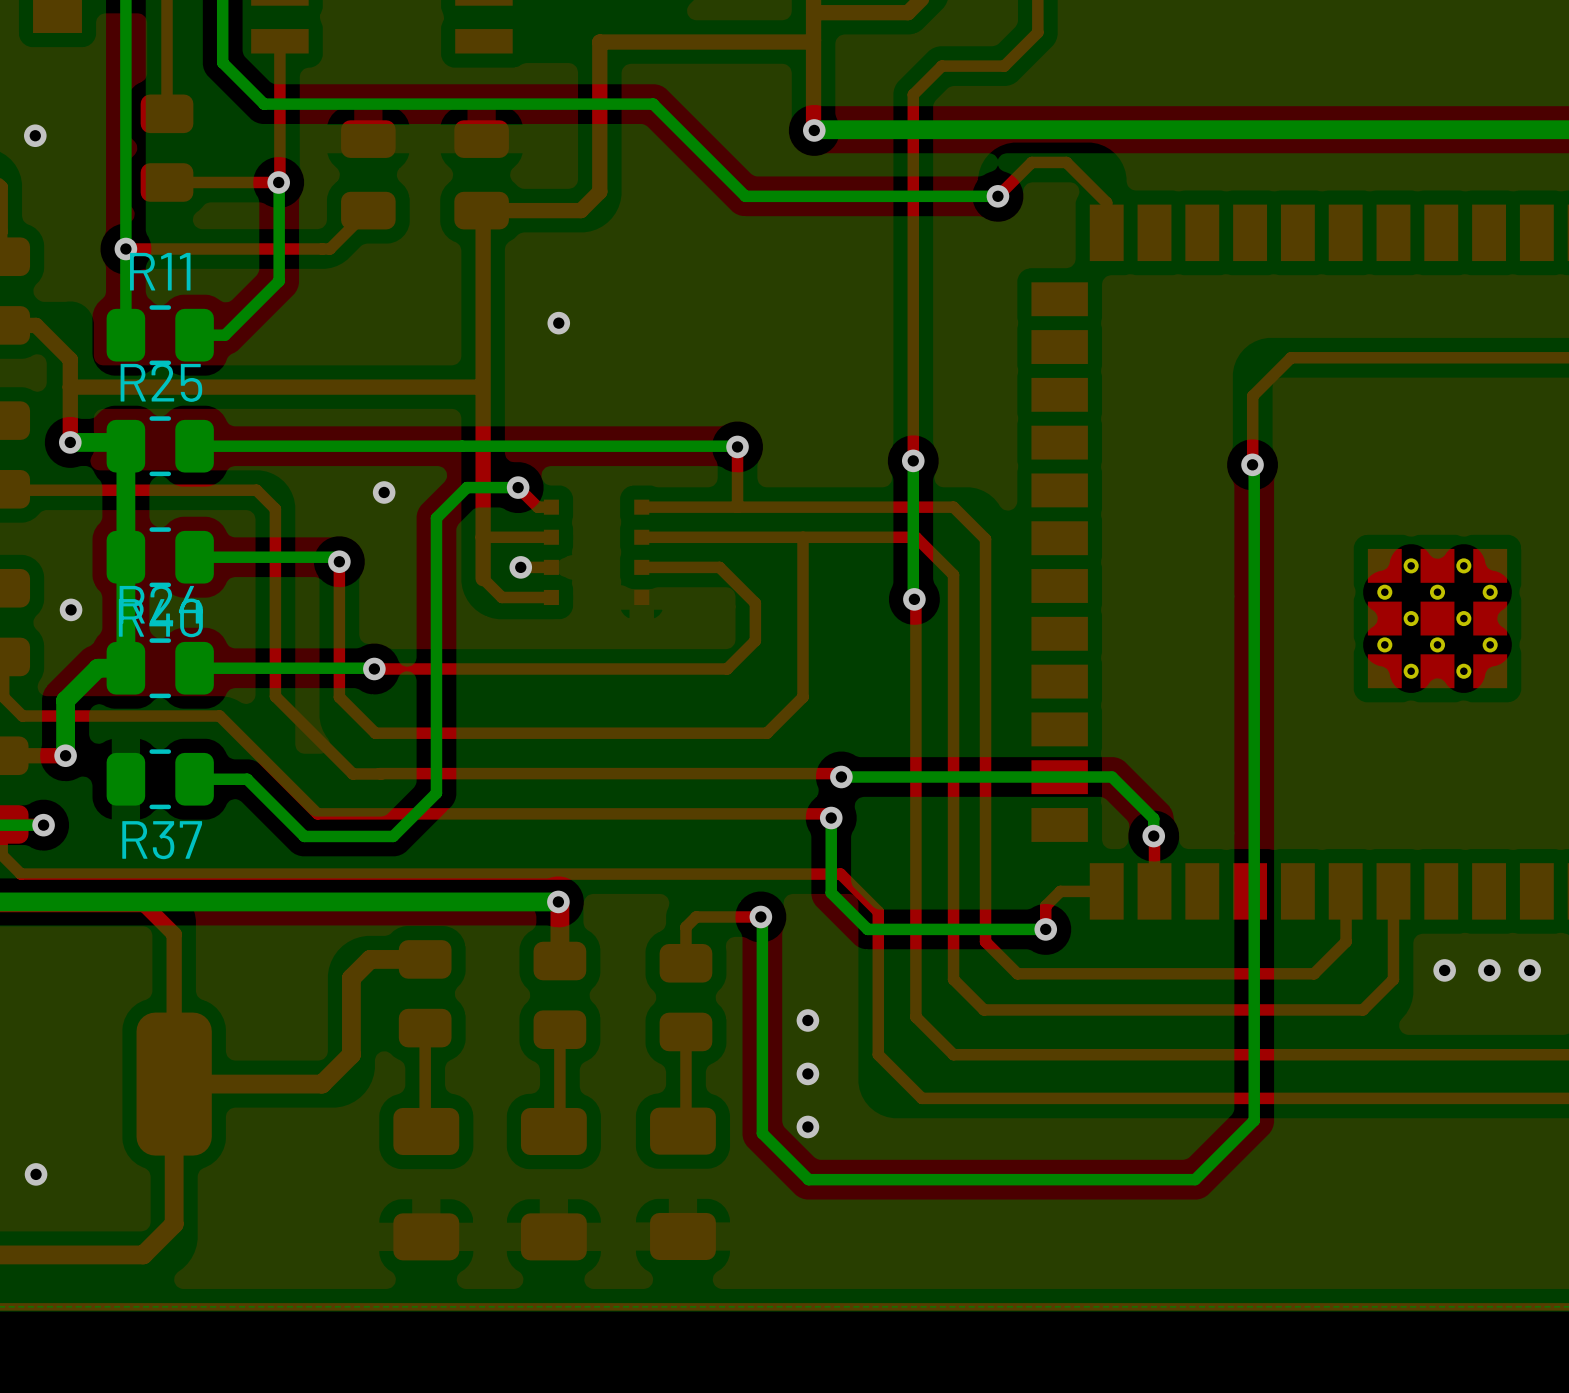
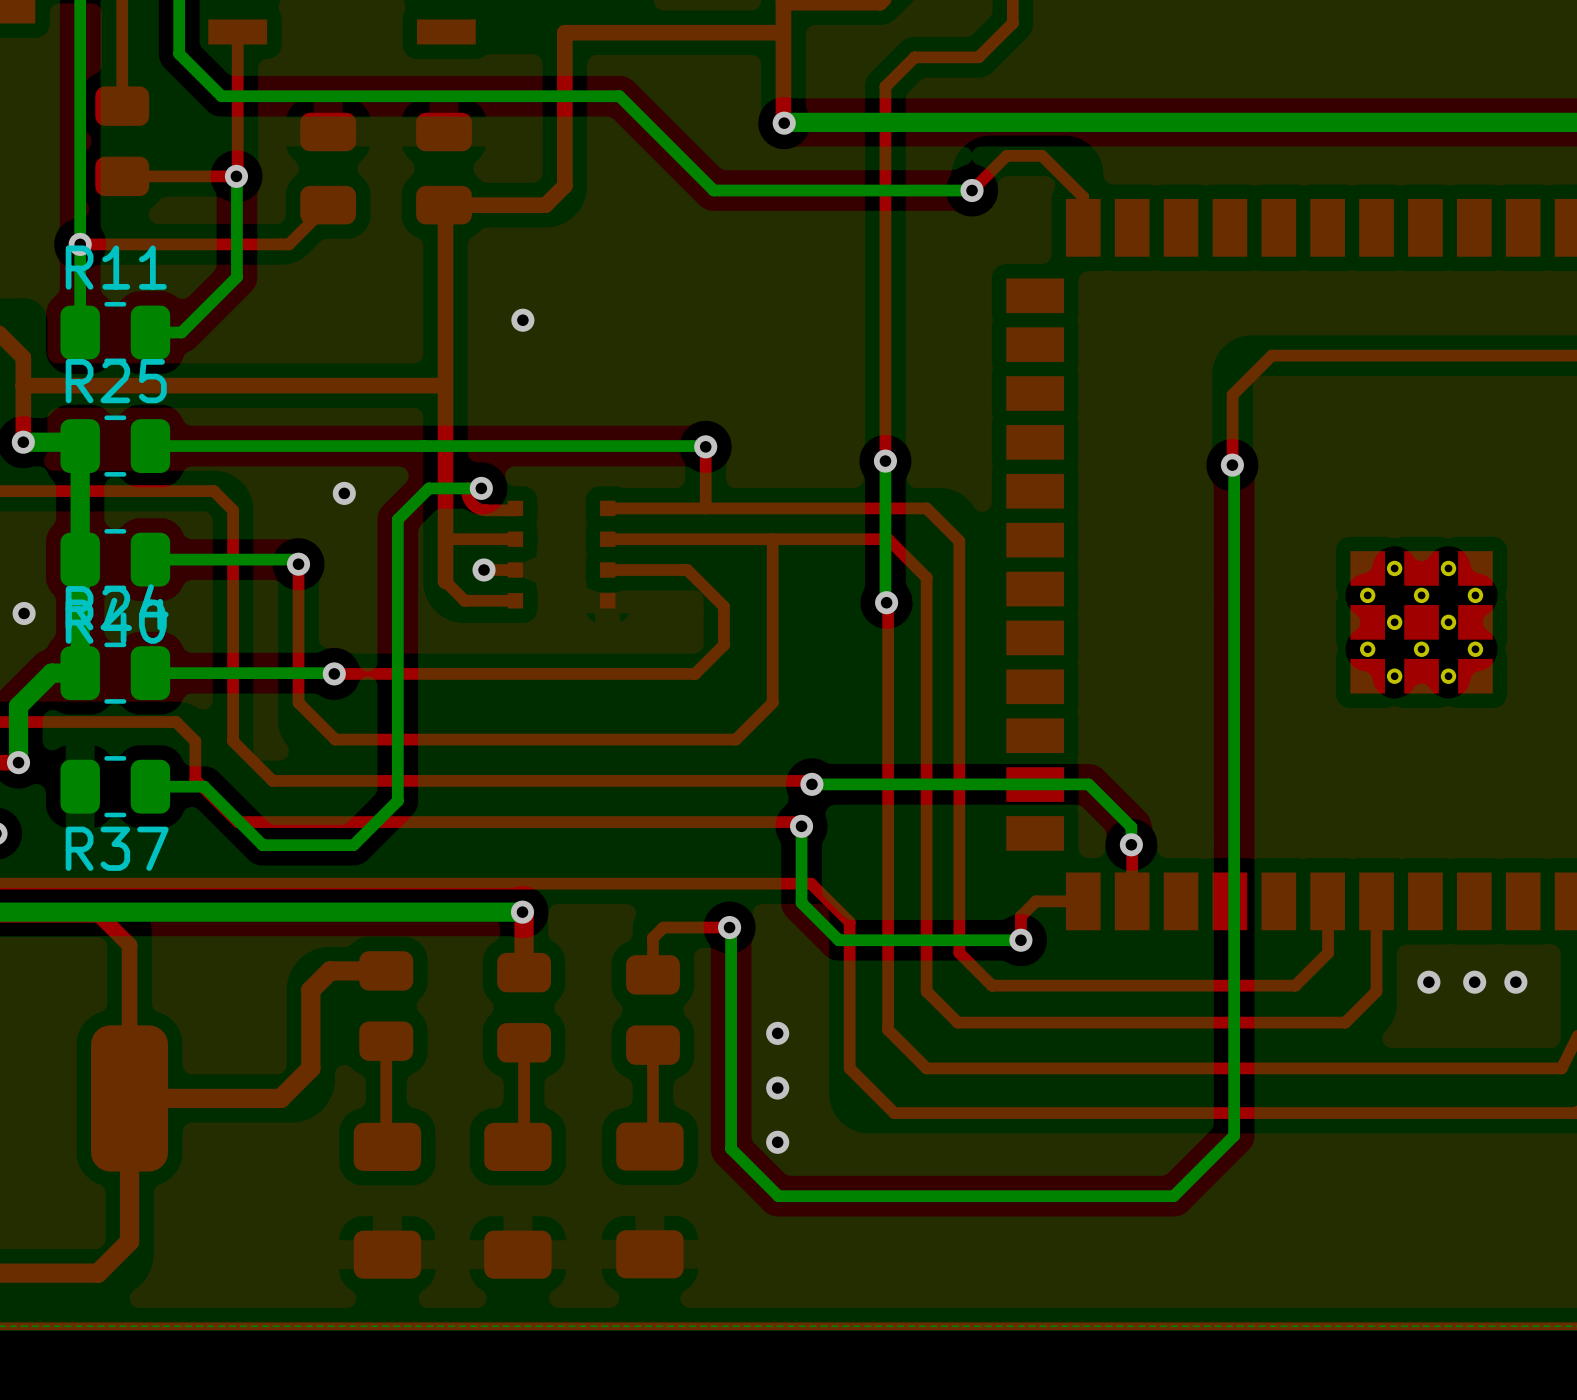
top track: (518, 487) (537, 507) (551, 507) -> (467, 488) (469, 500) (479, 508) (513, 510) (515, 508)
top track: (275, 696) (352, 773) (381, 773) -> (233, 702) (233, 741) (272, 780) (339, 780)
top track: (238, 734) (317, 813) -> (195, 741) (195, 779) (237, 822) (276, 822)

